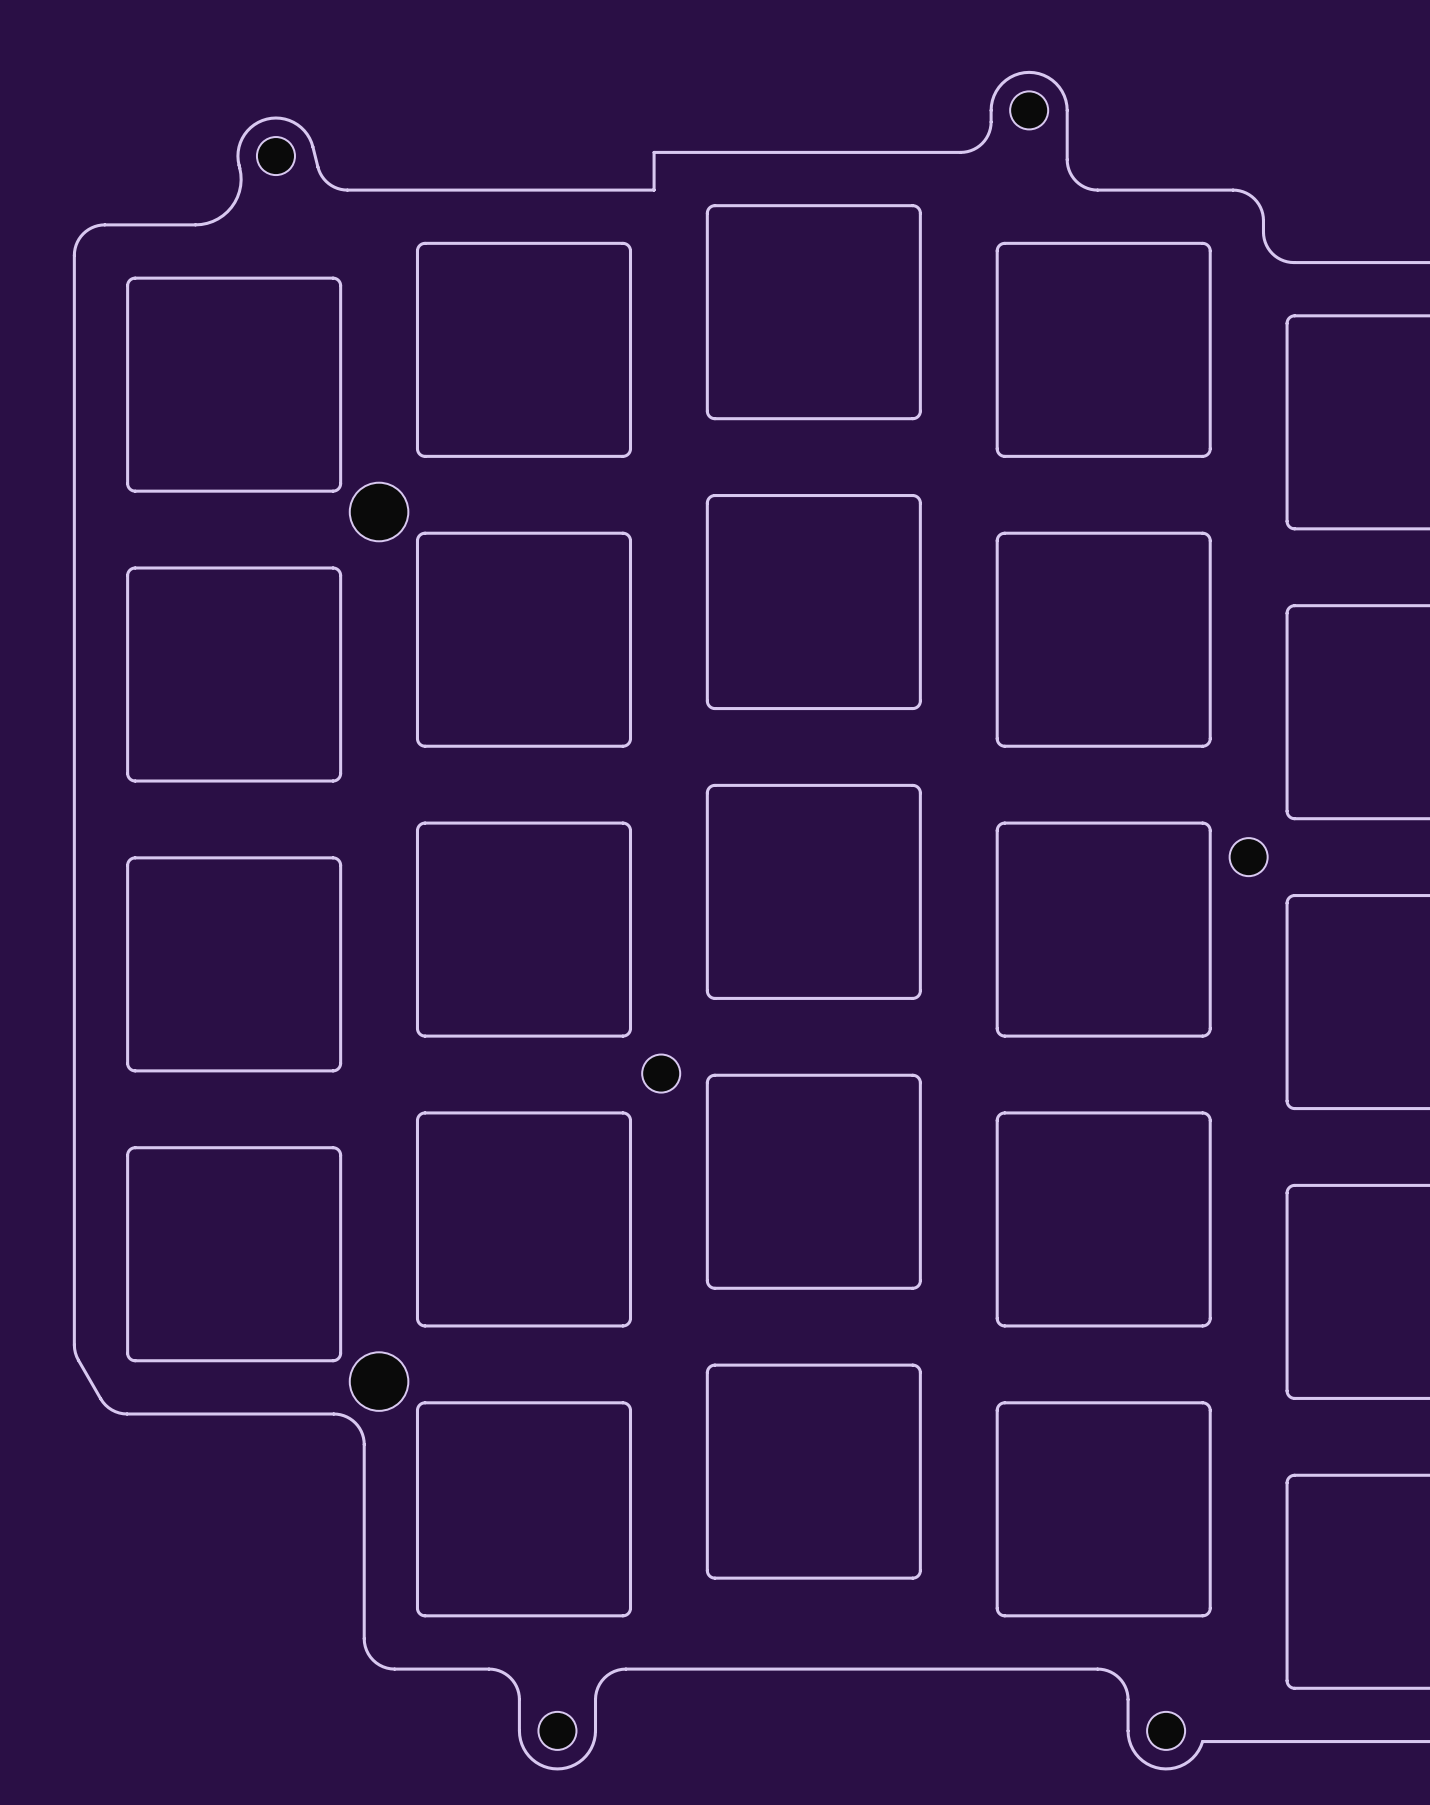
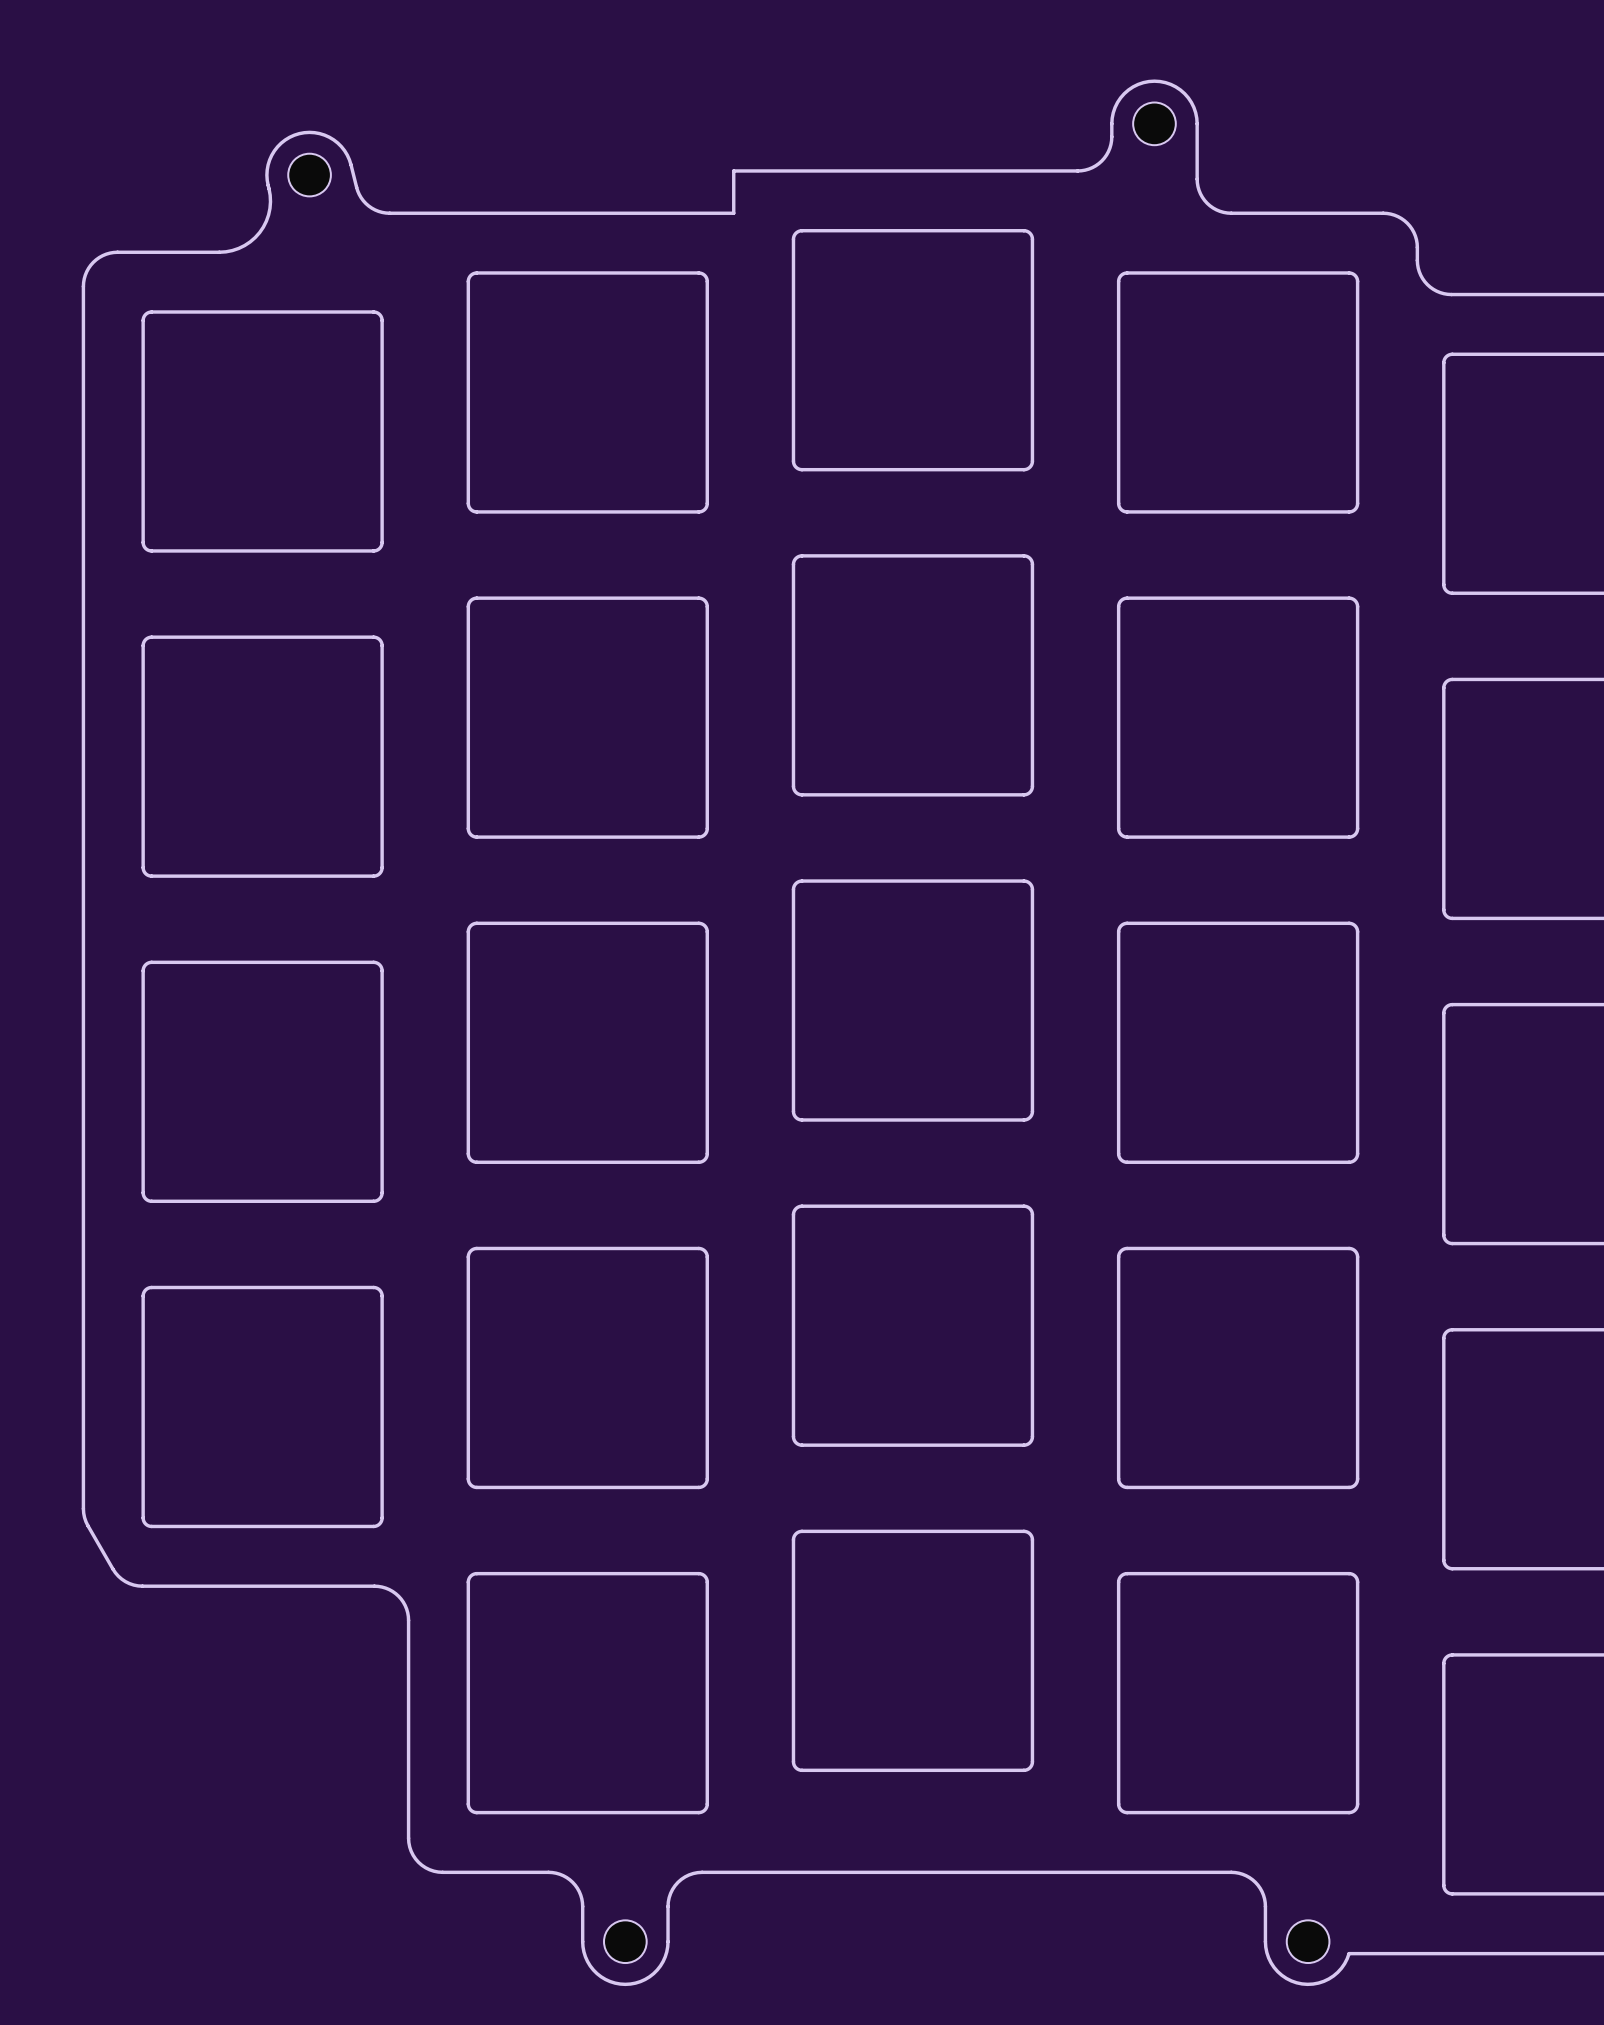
part: (379, 511) -> none
part: (1248, 857) -> none
part: (661, 1073) -> none
part: (379, 1381) -> none

